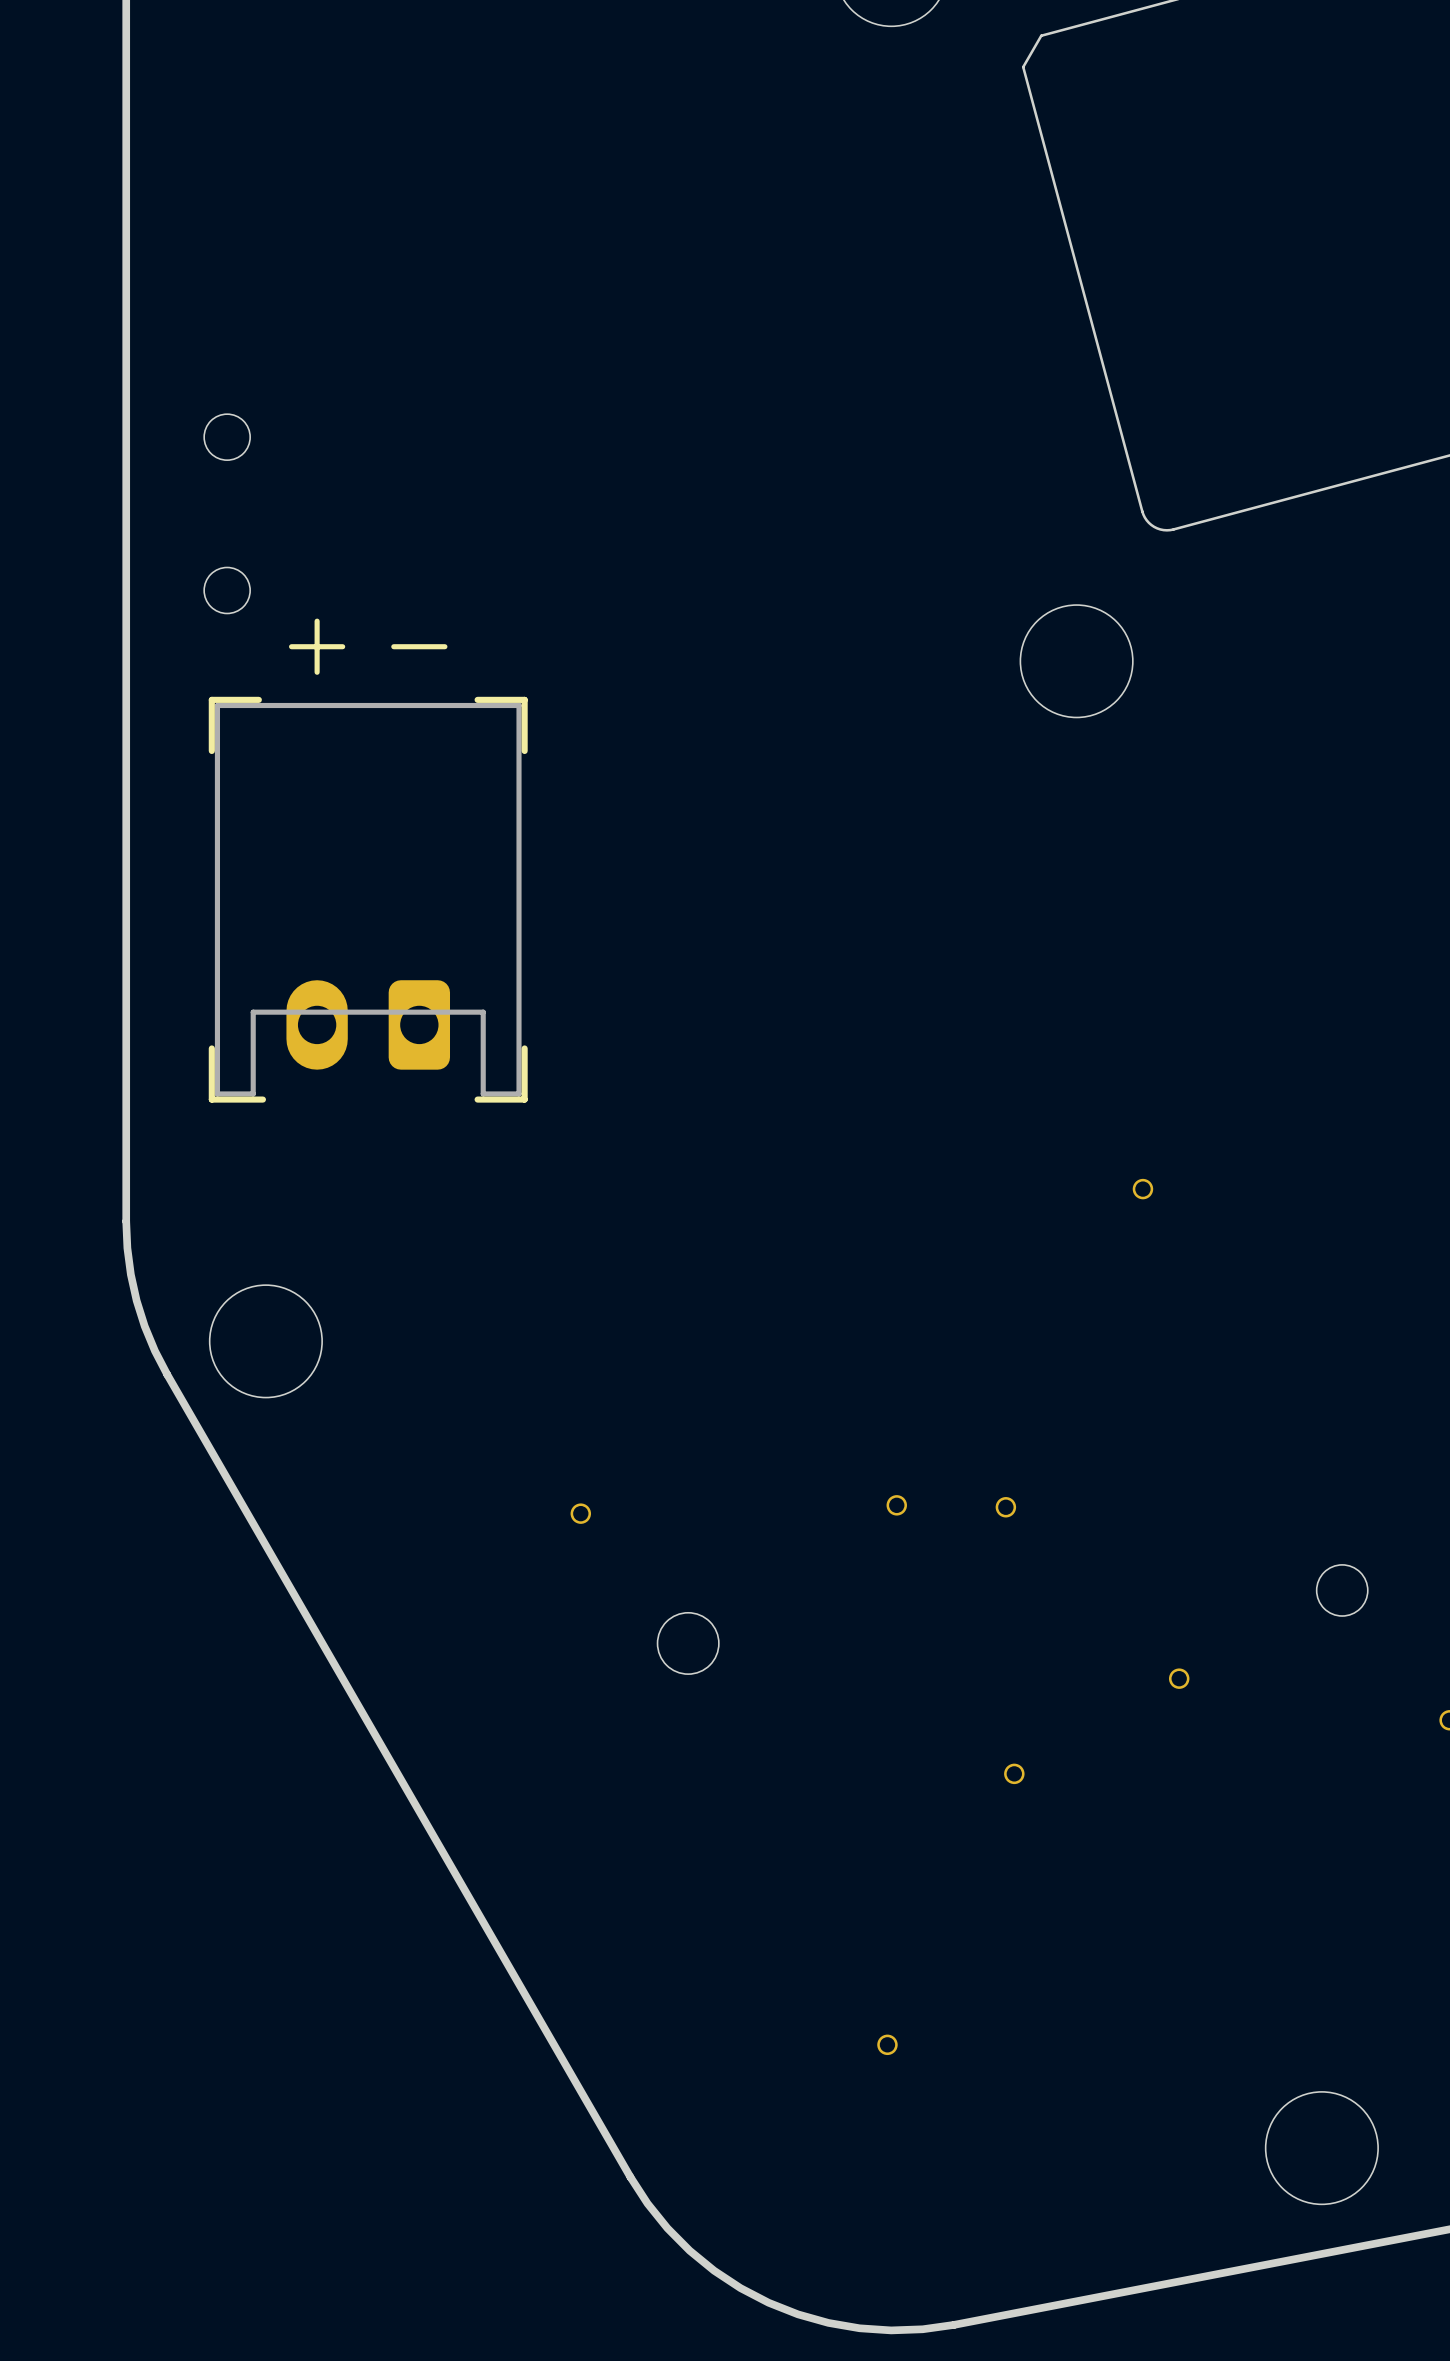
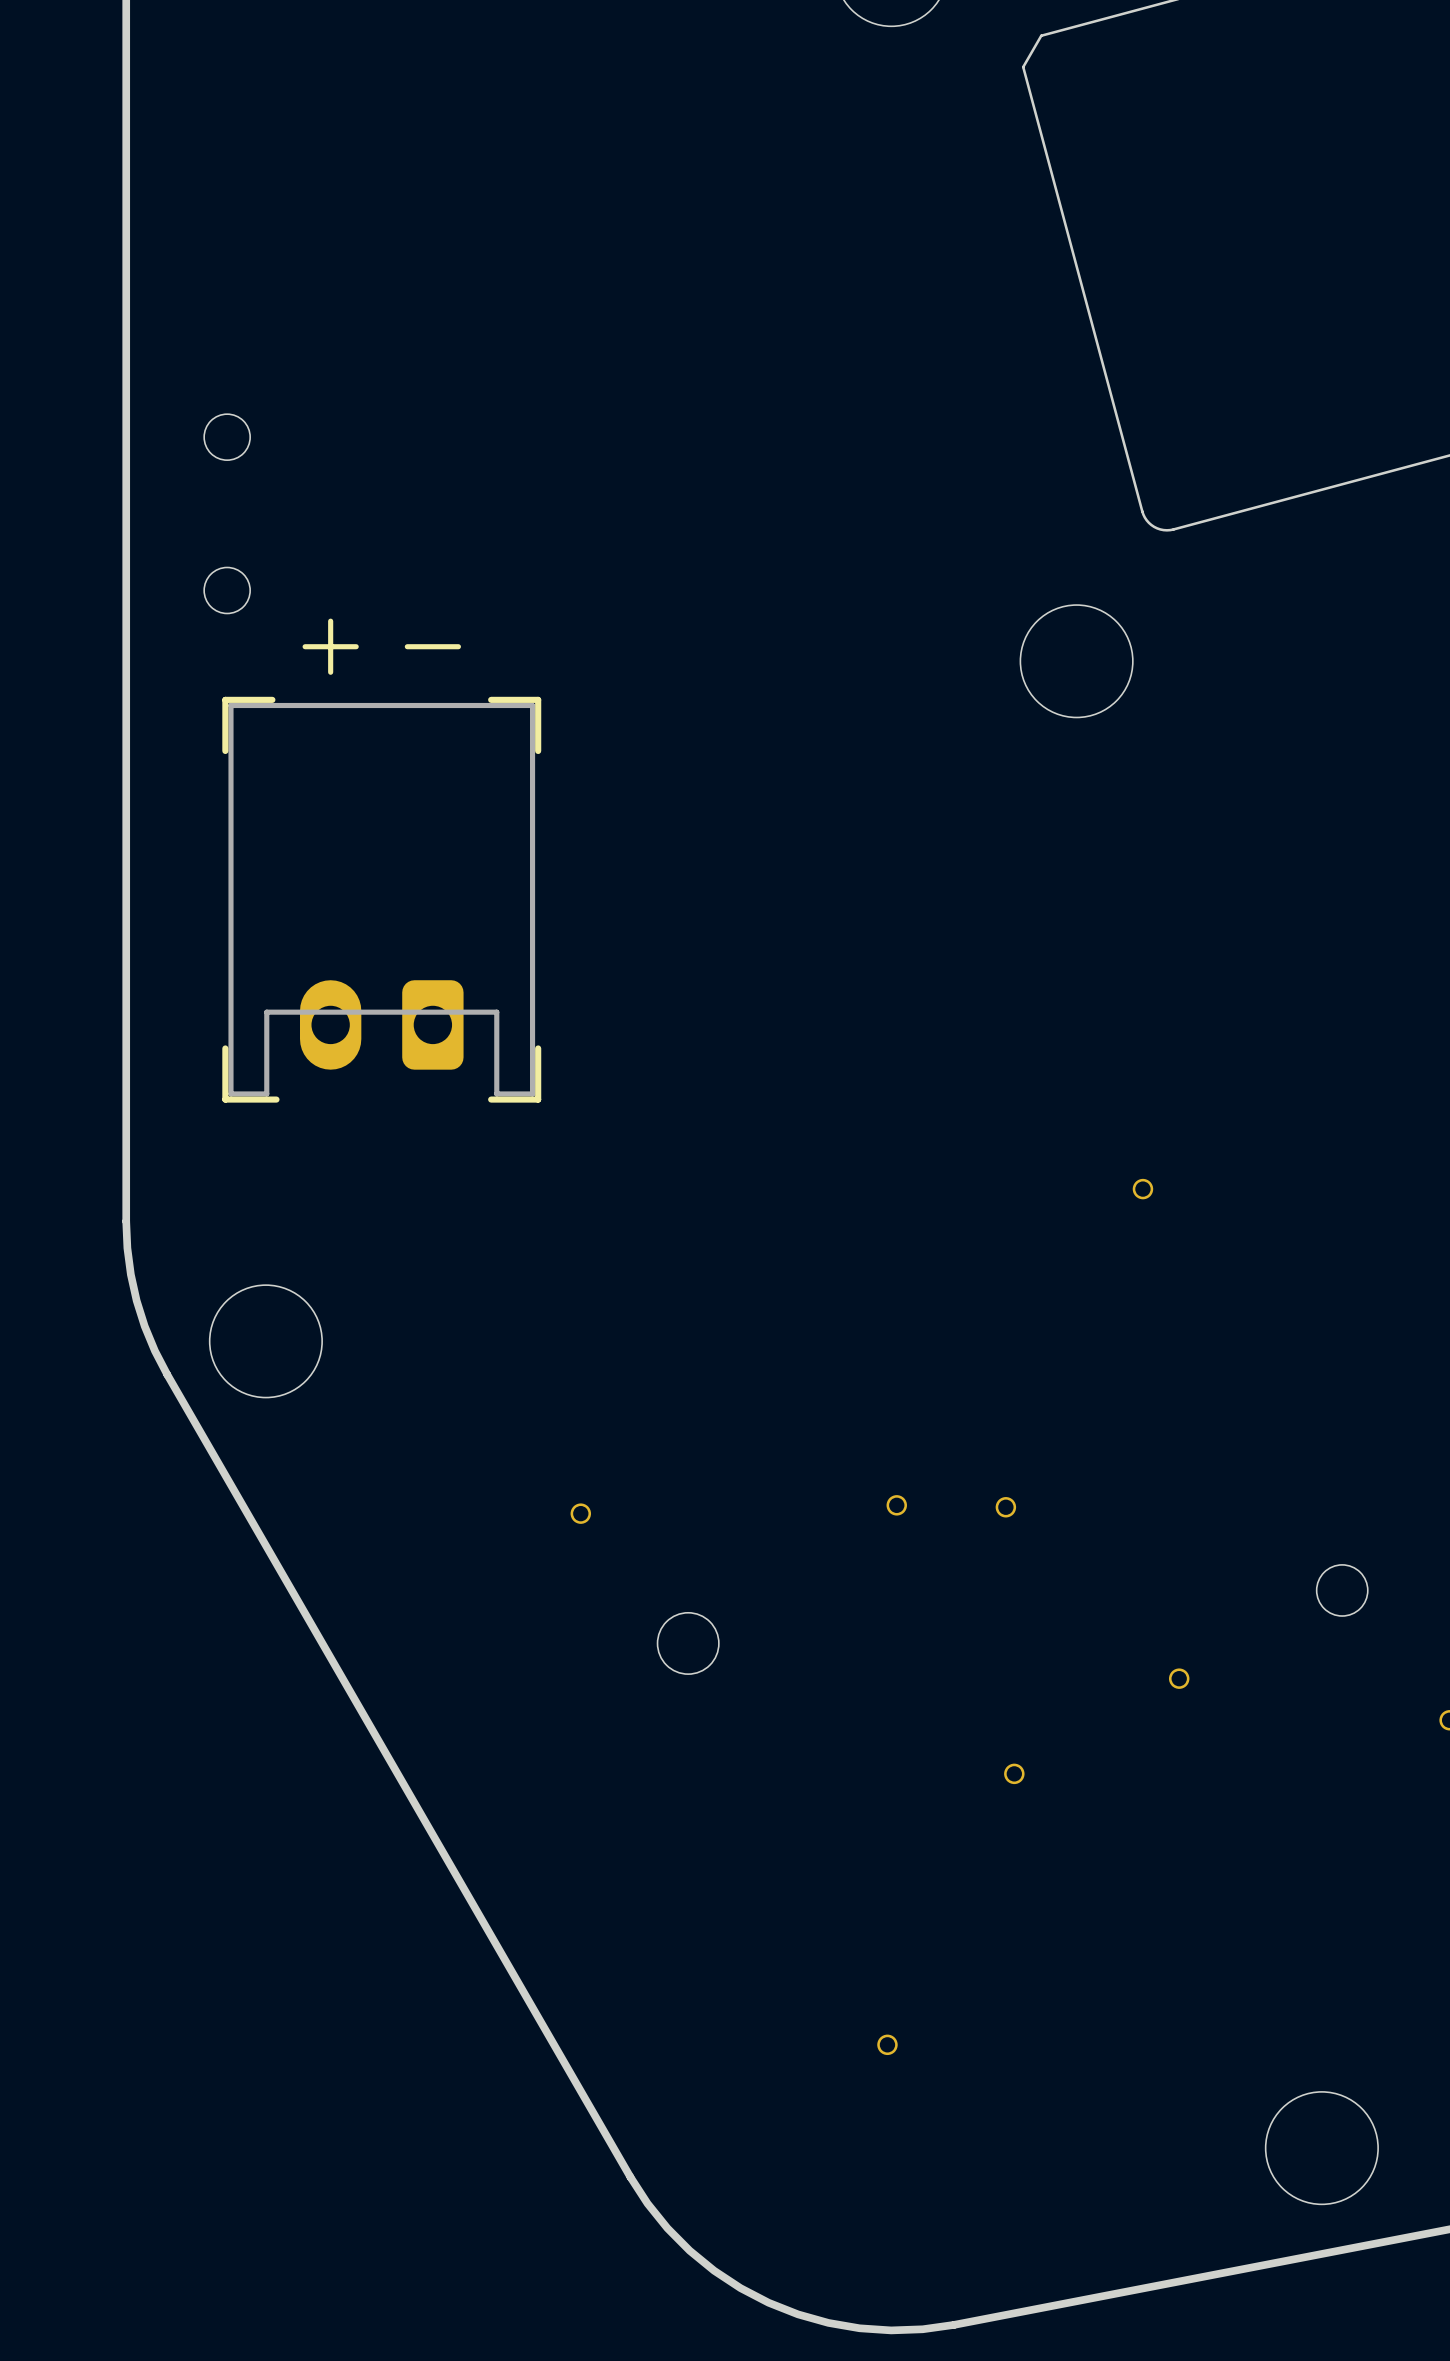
part position: (368, 860) -> (381, 860)

